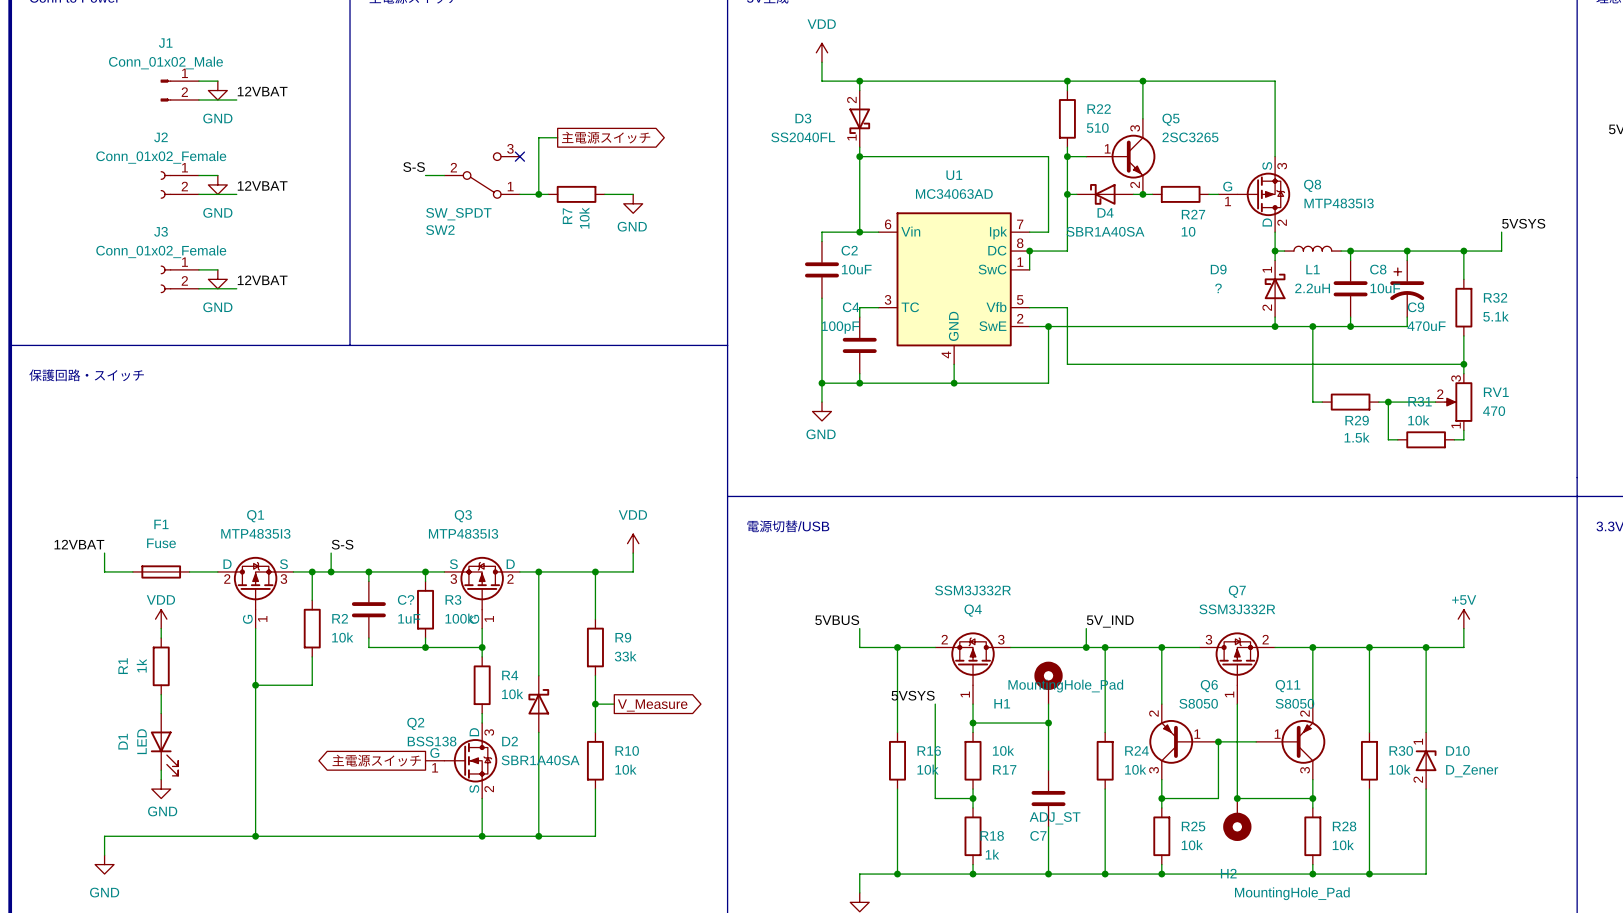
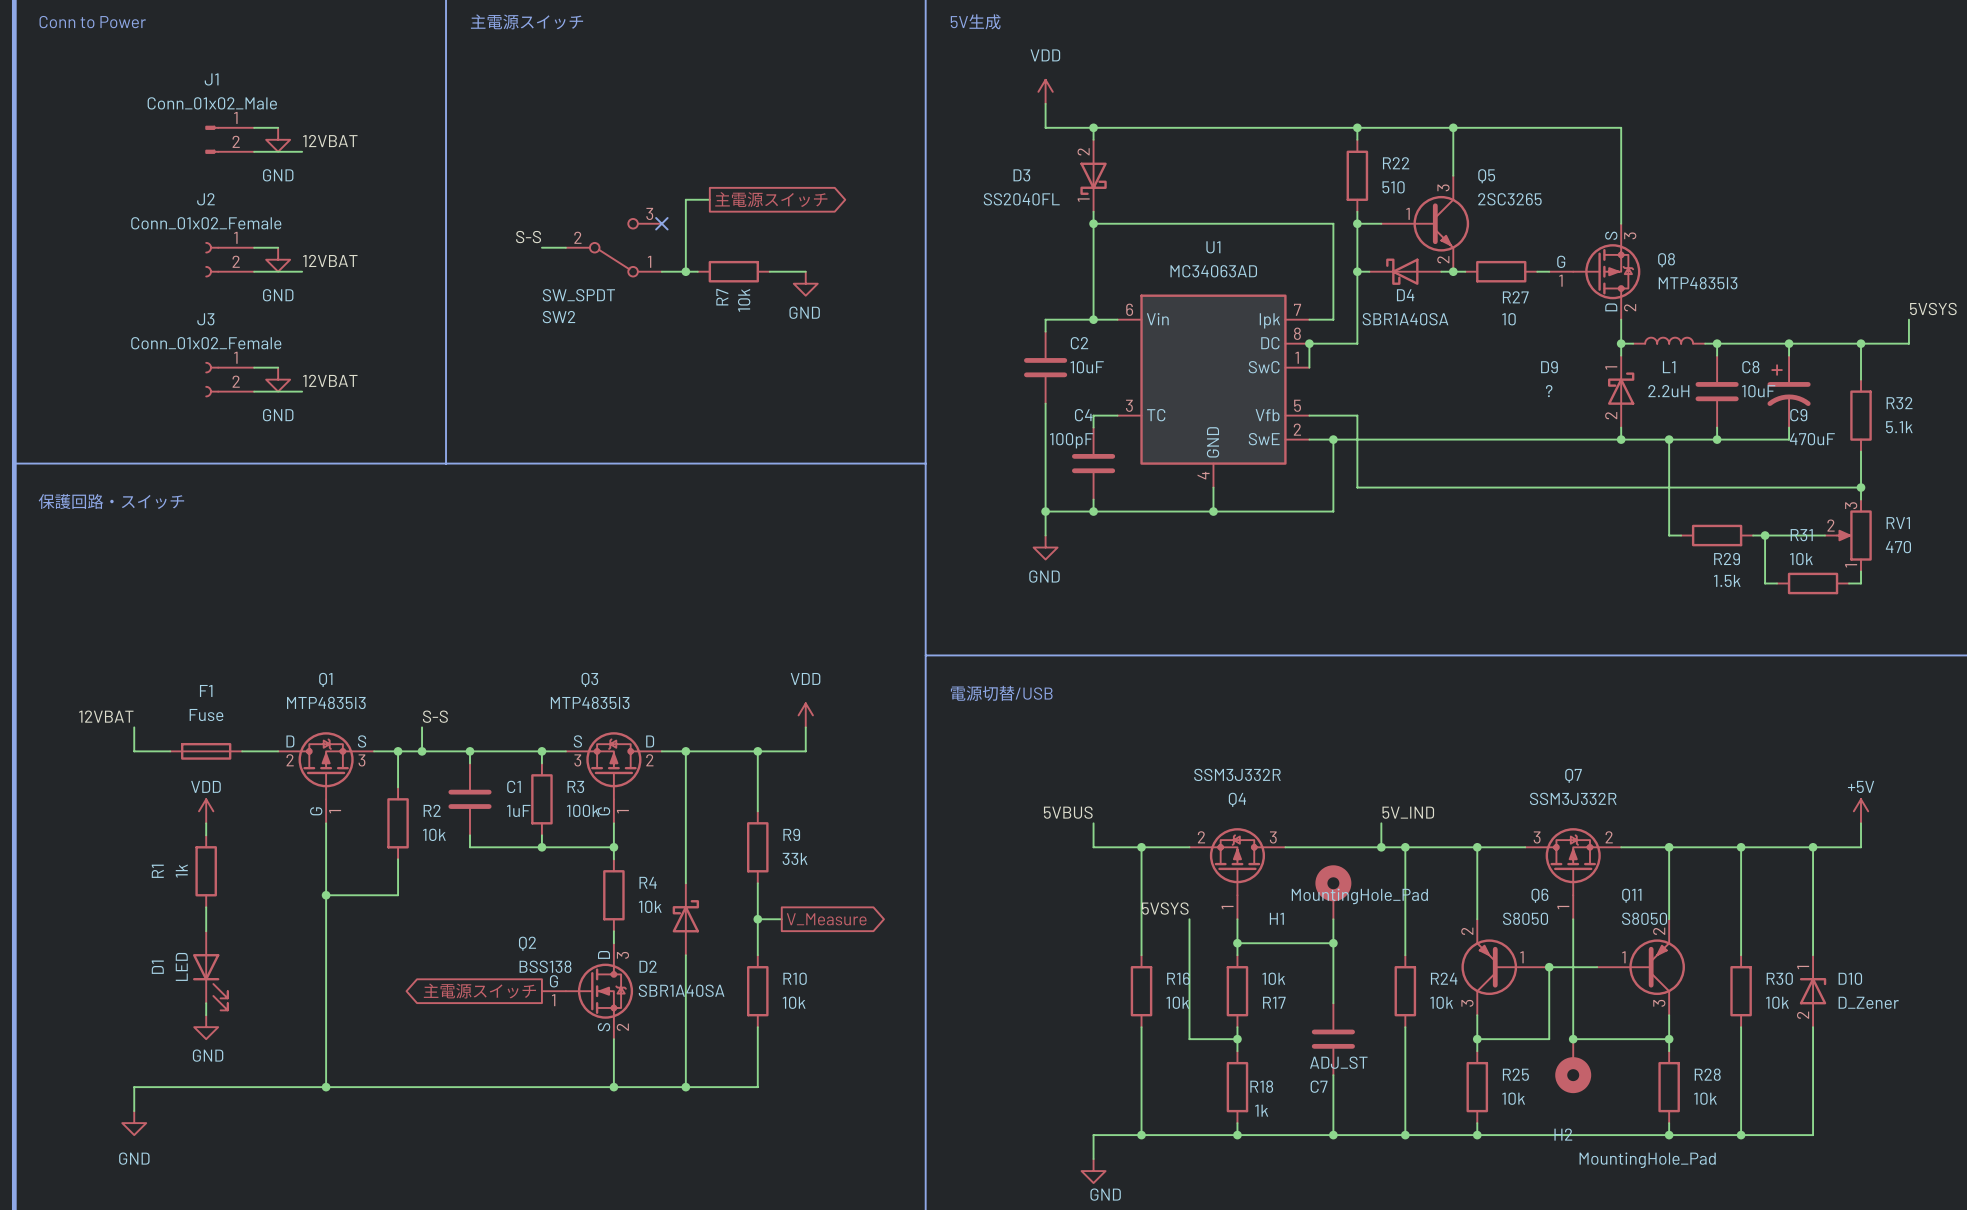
C? name: C? (406, 599) -> C1 (513, 786)

